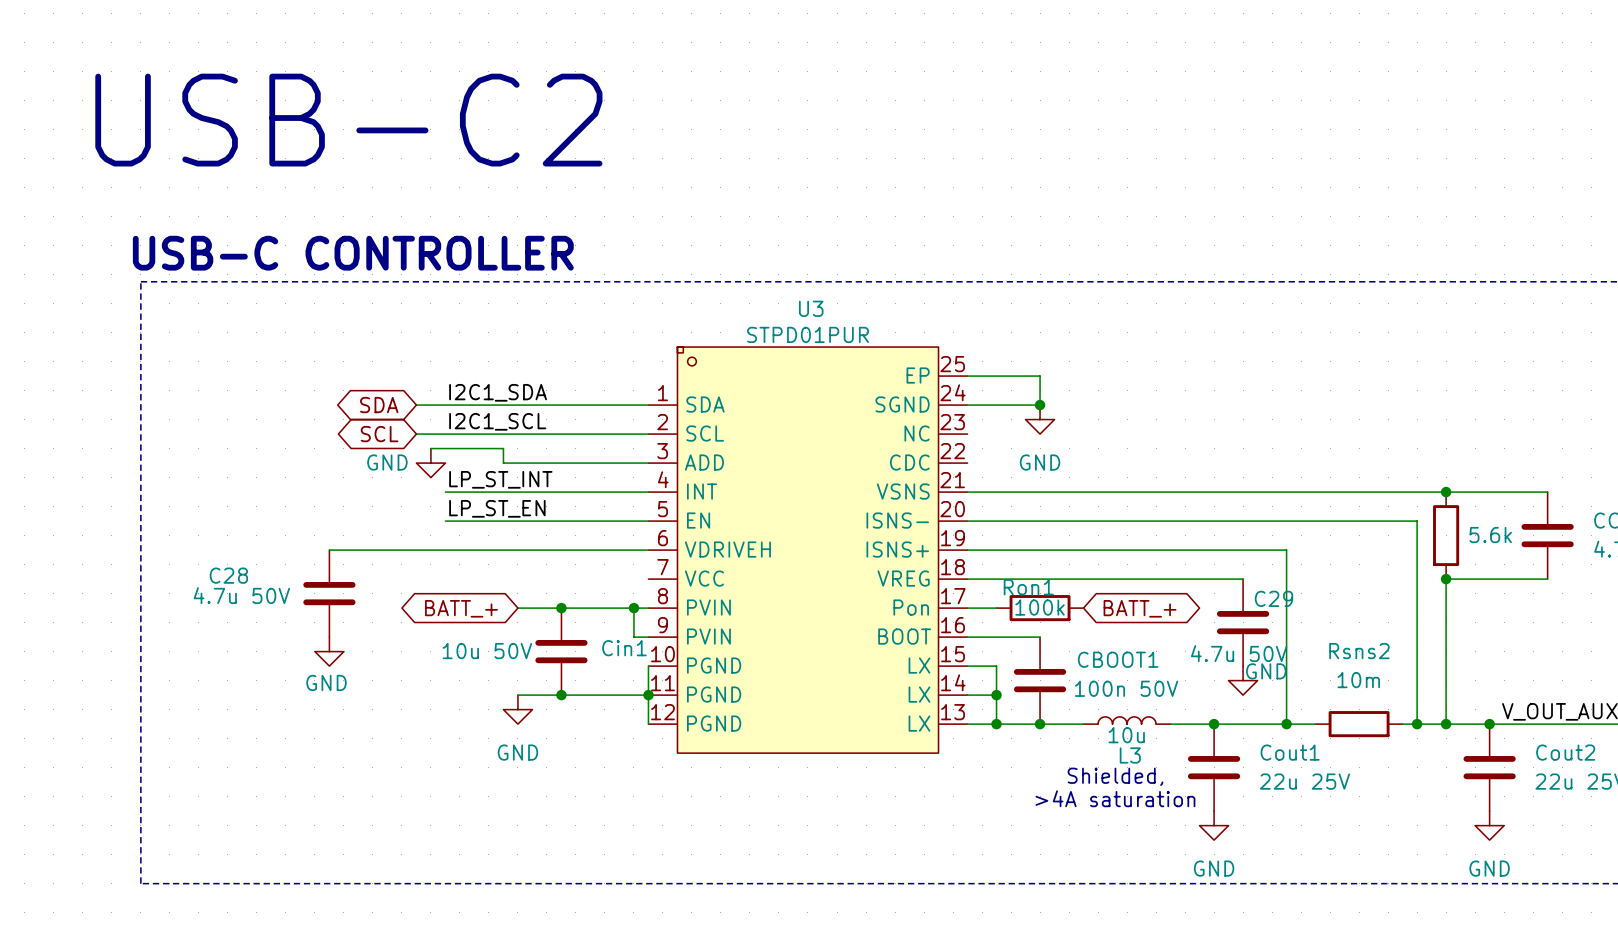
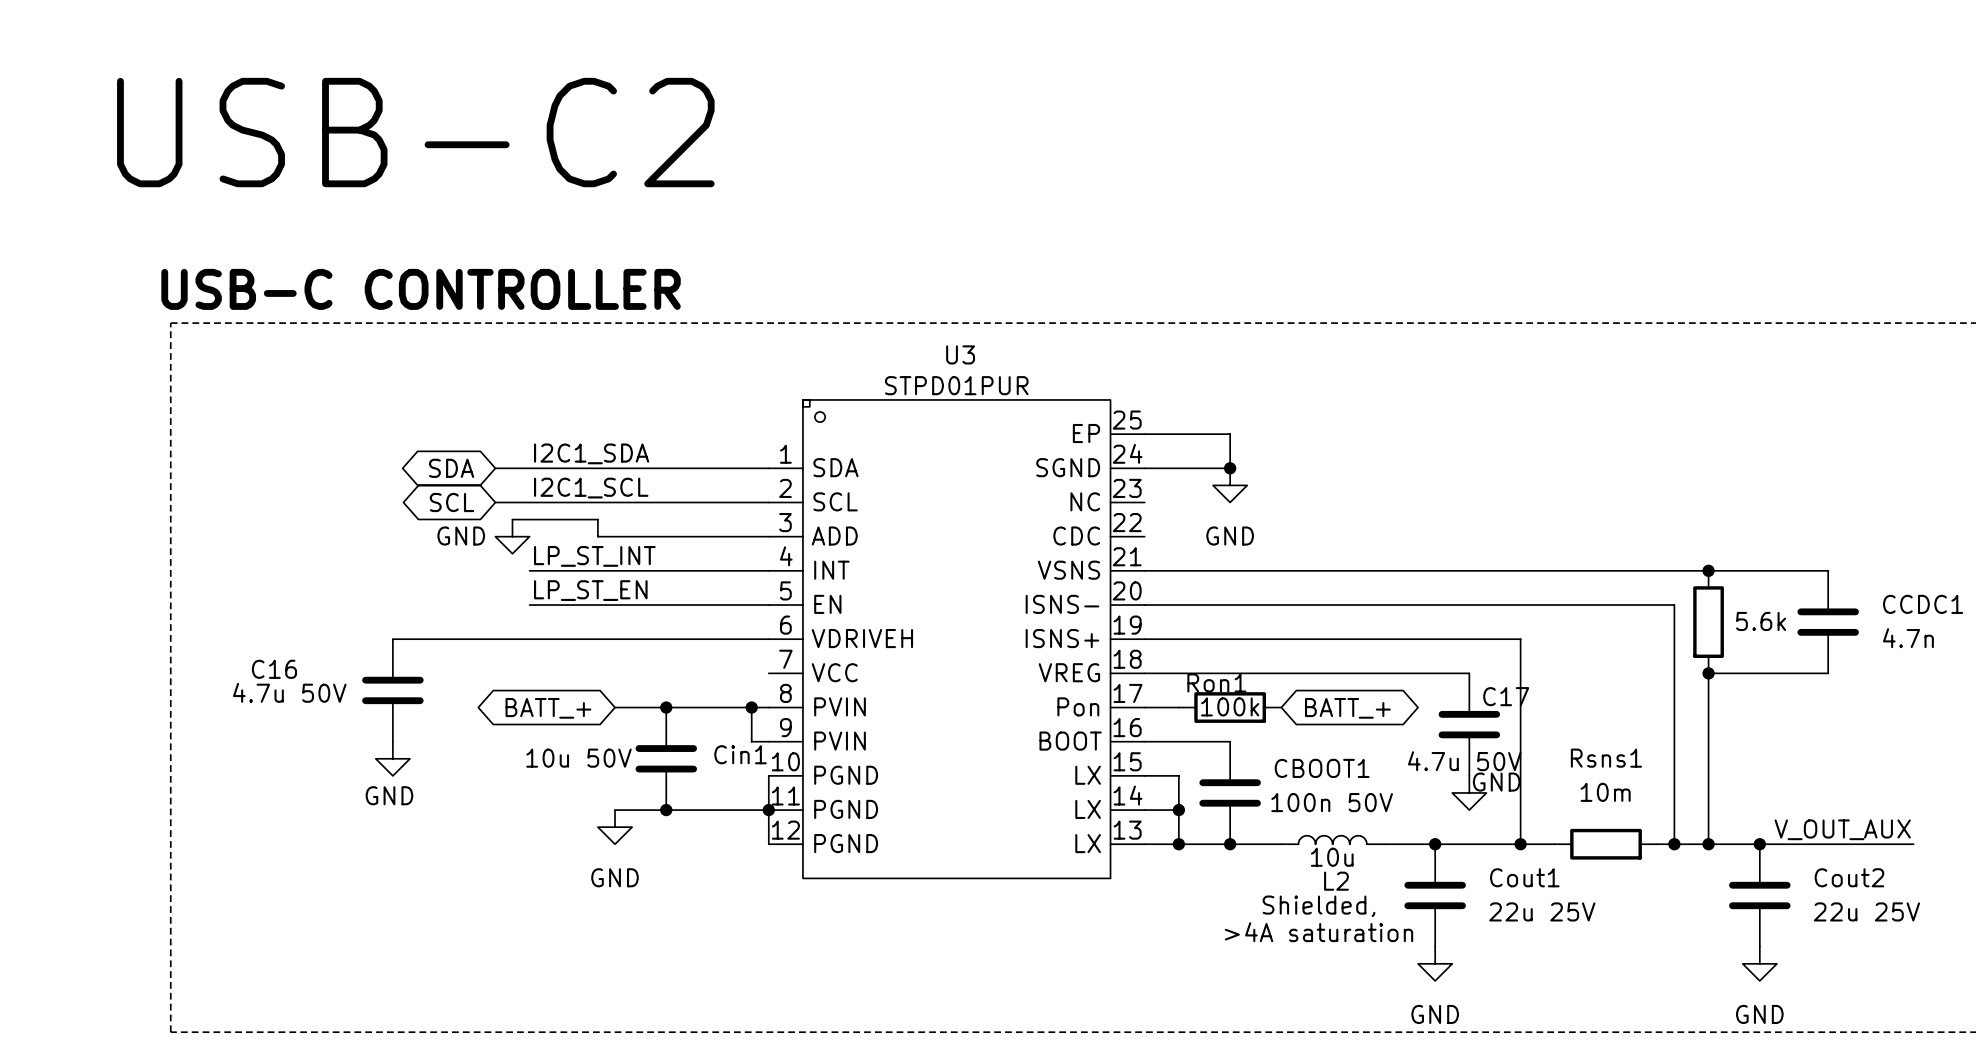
C28 name: C28 (228, 575) -> C16 (274, 669)
C29 name: C29 (1273, 598) -> C17 (1506, 696)
Rsns2 name: Rsns2 (1359, 651) -> Rsns1 (1606, 758)
L3 name: L3 (1130, 755) -> L2 (1336, 881)

